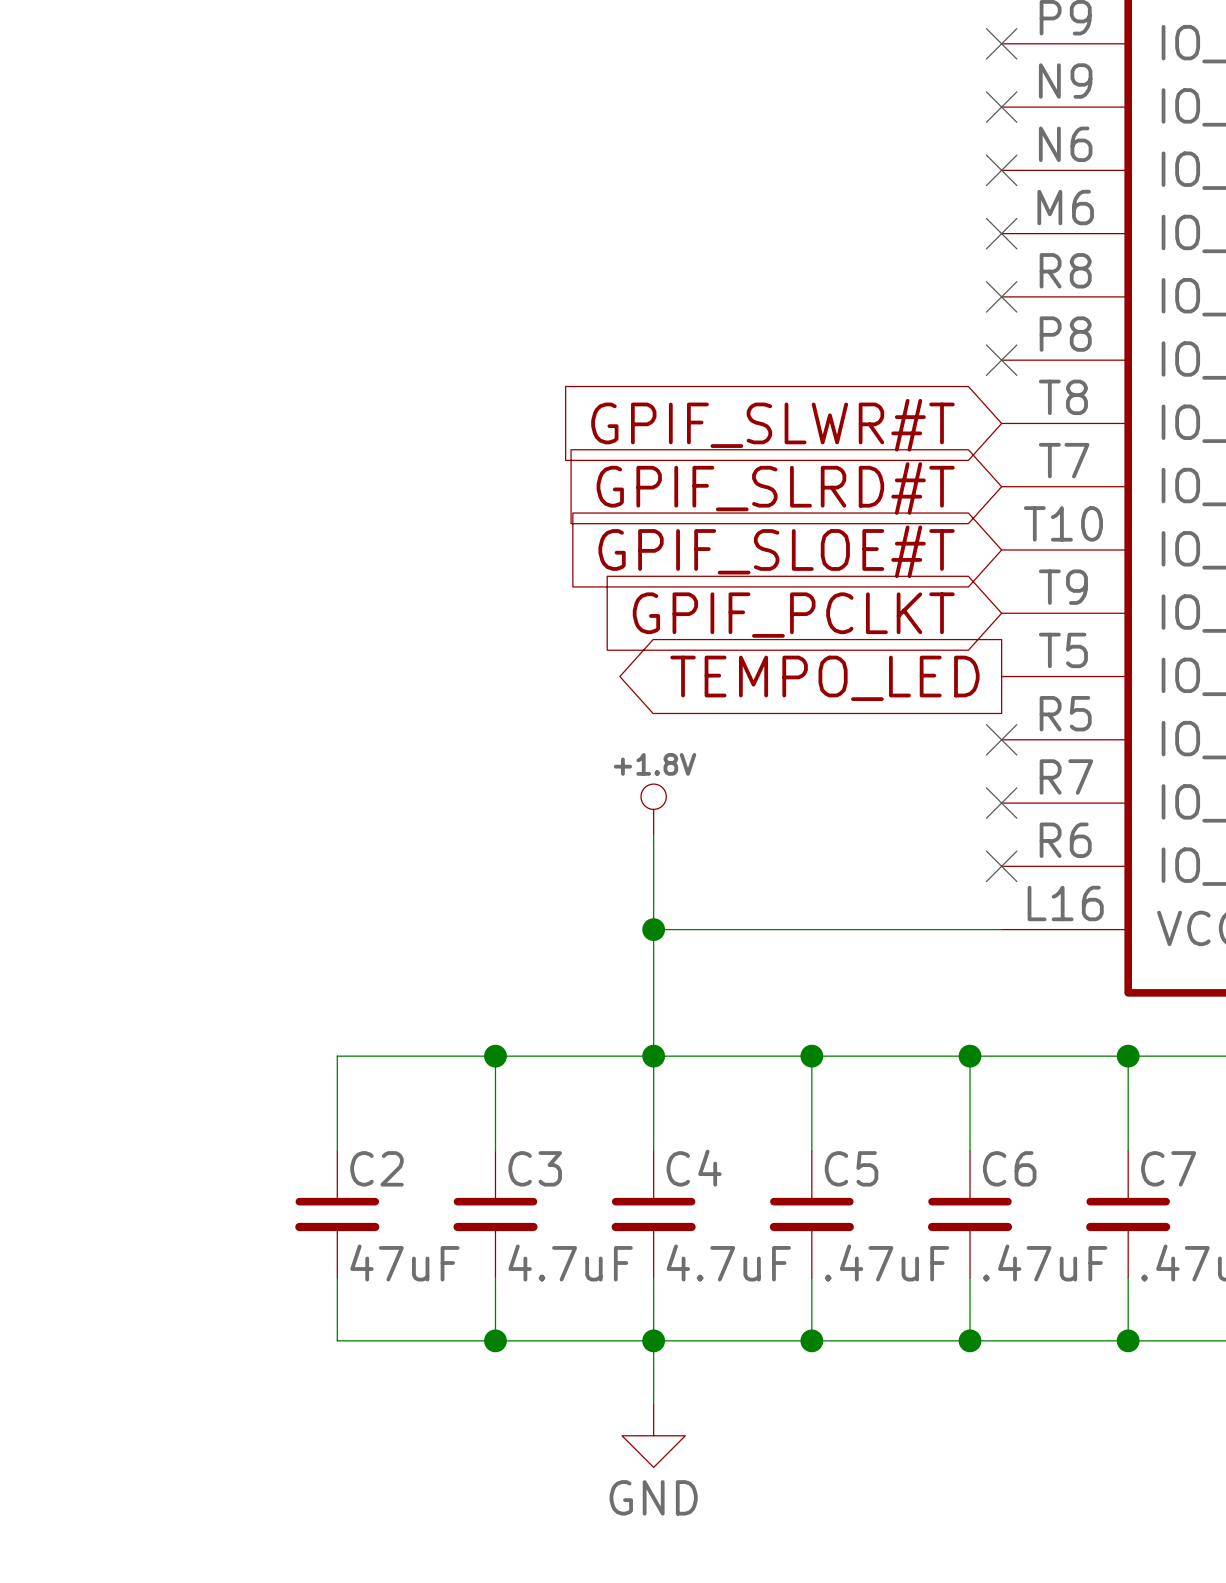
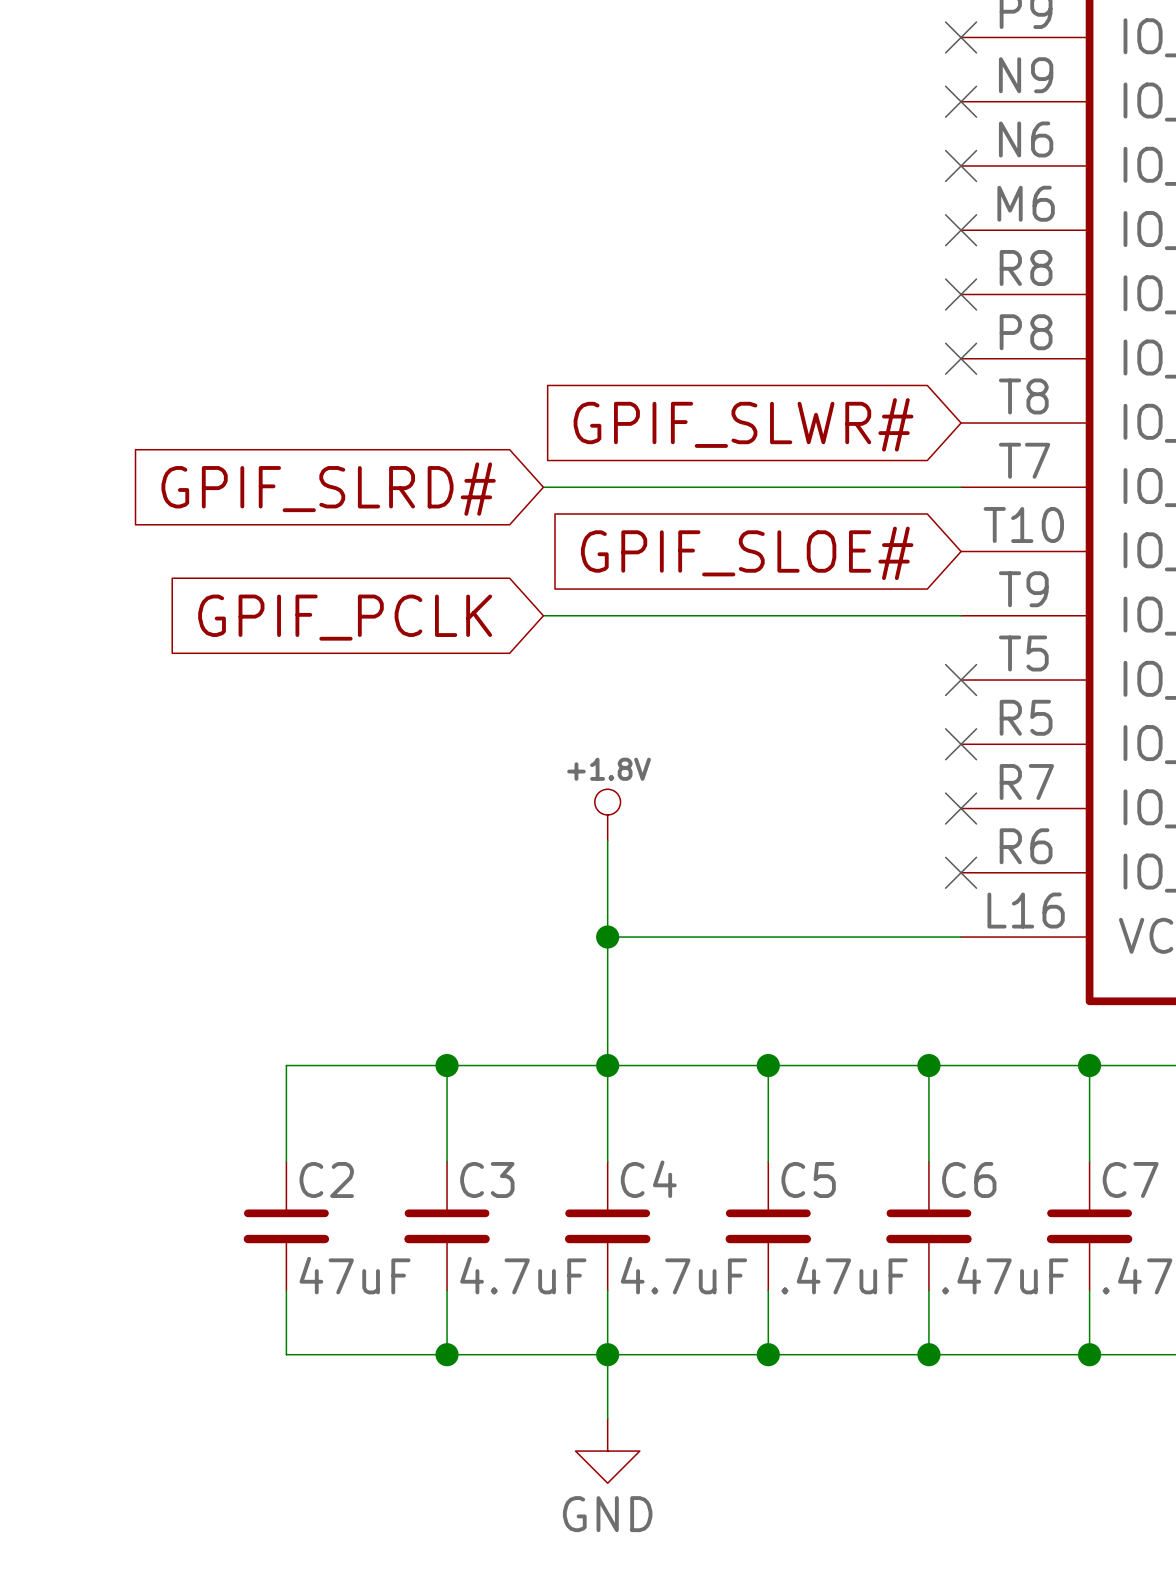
global label: GPIF_SLWR#T (772, 425) -> GPIF_SLWR# (743, 424)
wire: none -> (543, 487) (961, 487)
global label: GPIF_SLRD#T (775, 488) -> GPIF_SLRD# (328, 489)
global label: GPIF_SLOE#T (776, 551) -> GPIF_SLOE# (747, 553)
wire: none -> (543, 615) (961, 615)
global label: GPIF_PCLKT (793, 615) -> GPIF_PCLK (345, 617)
no-connect mark: none -> (961, 680)
global label: TEMPO_LED (824, 678) -> none

